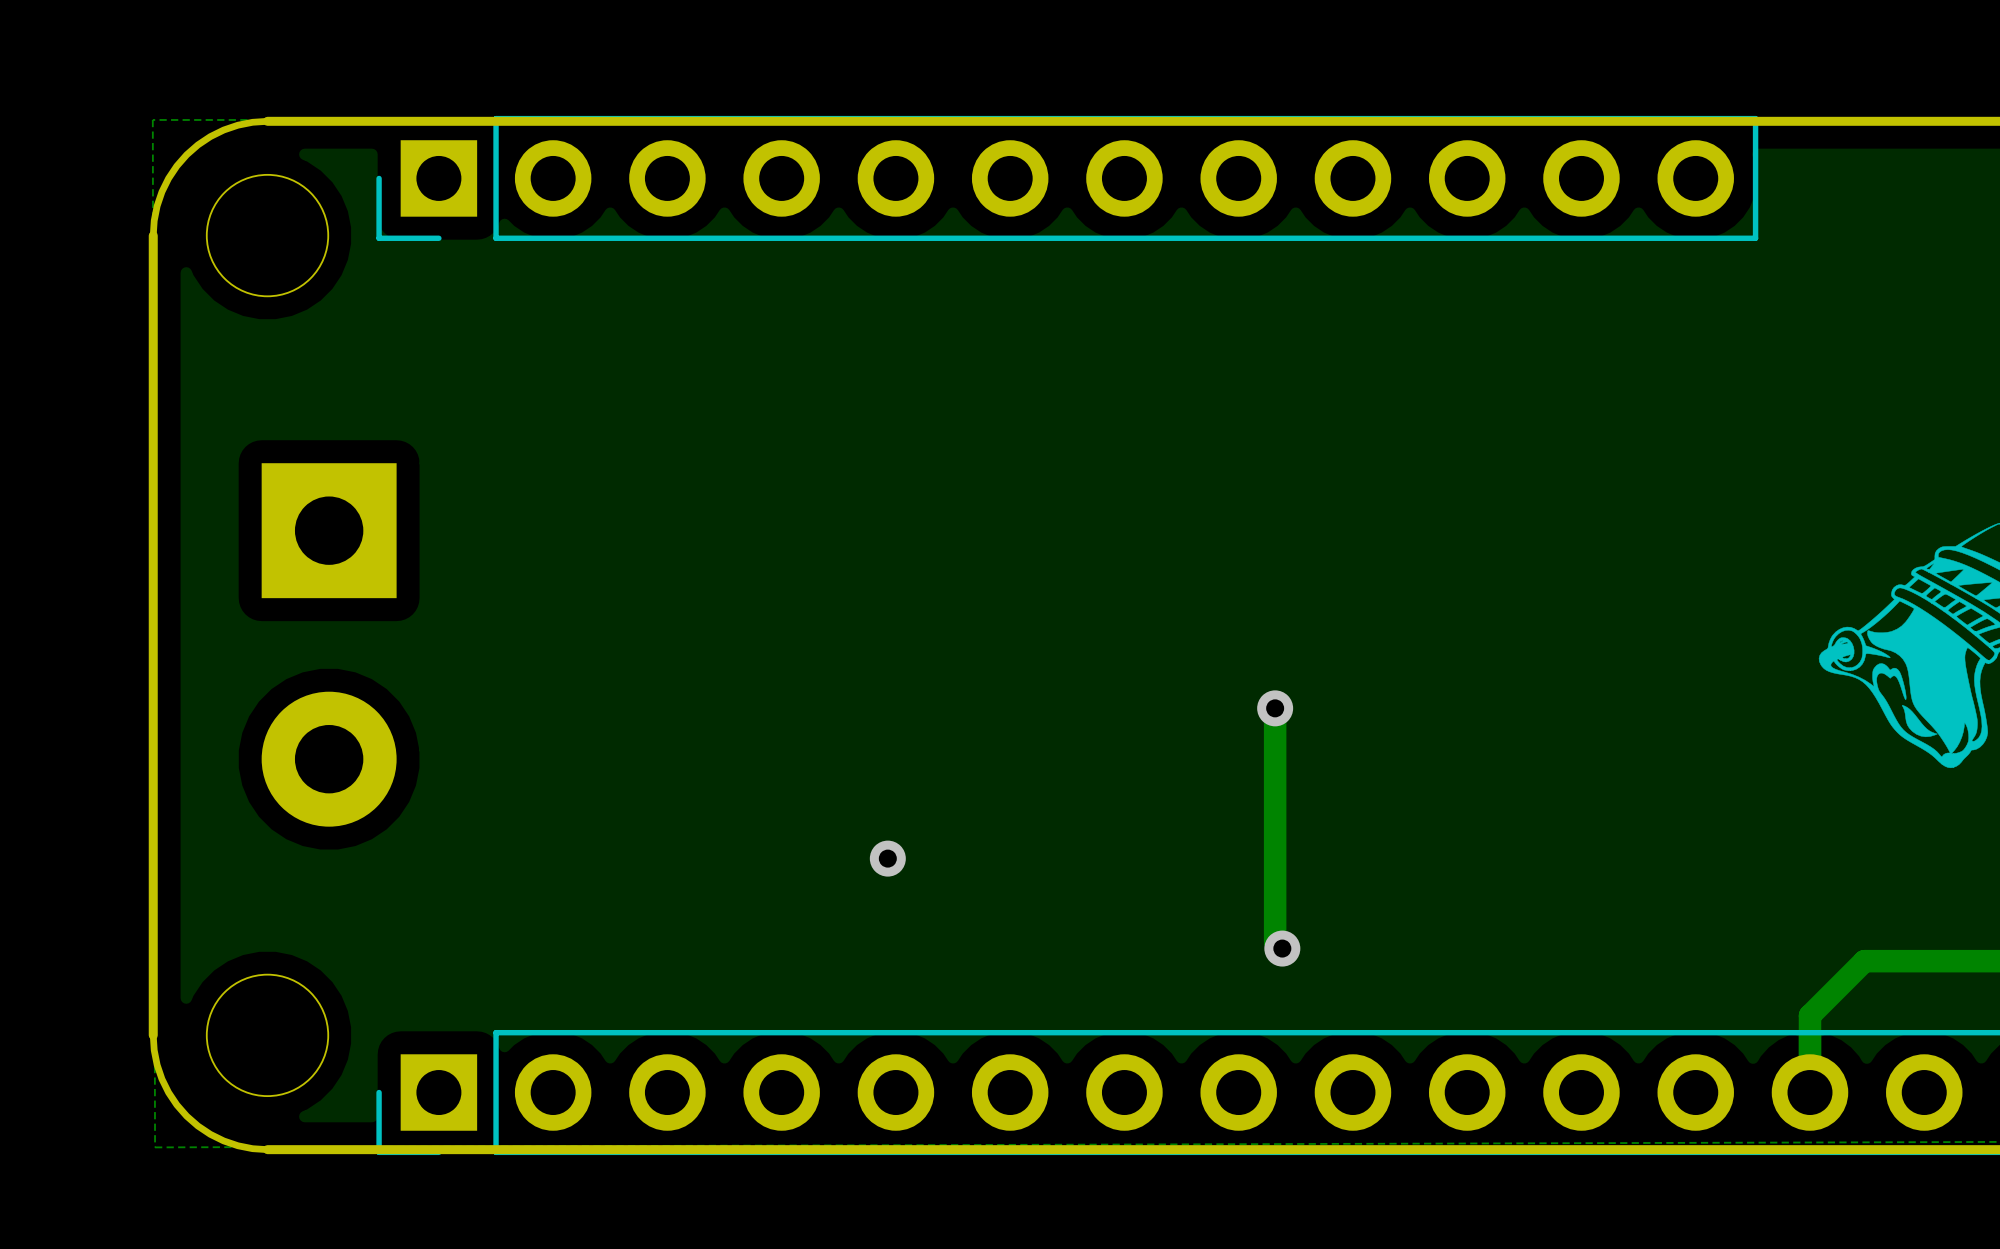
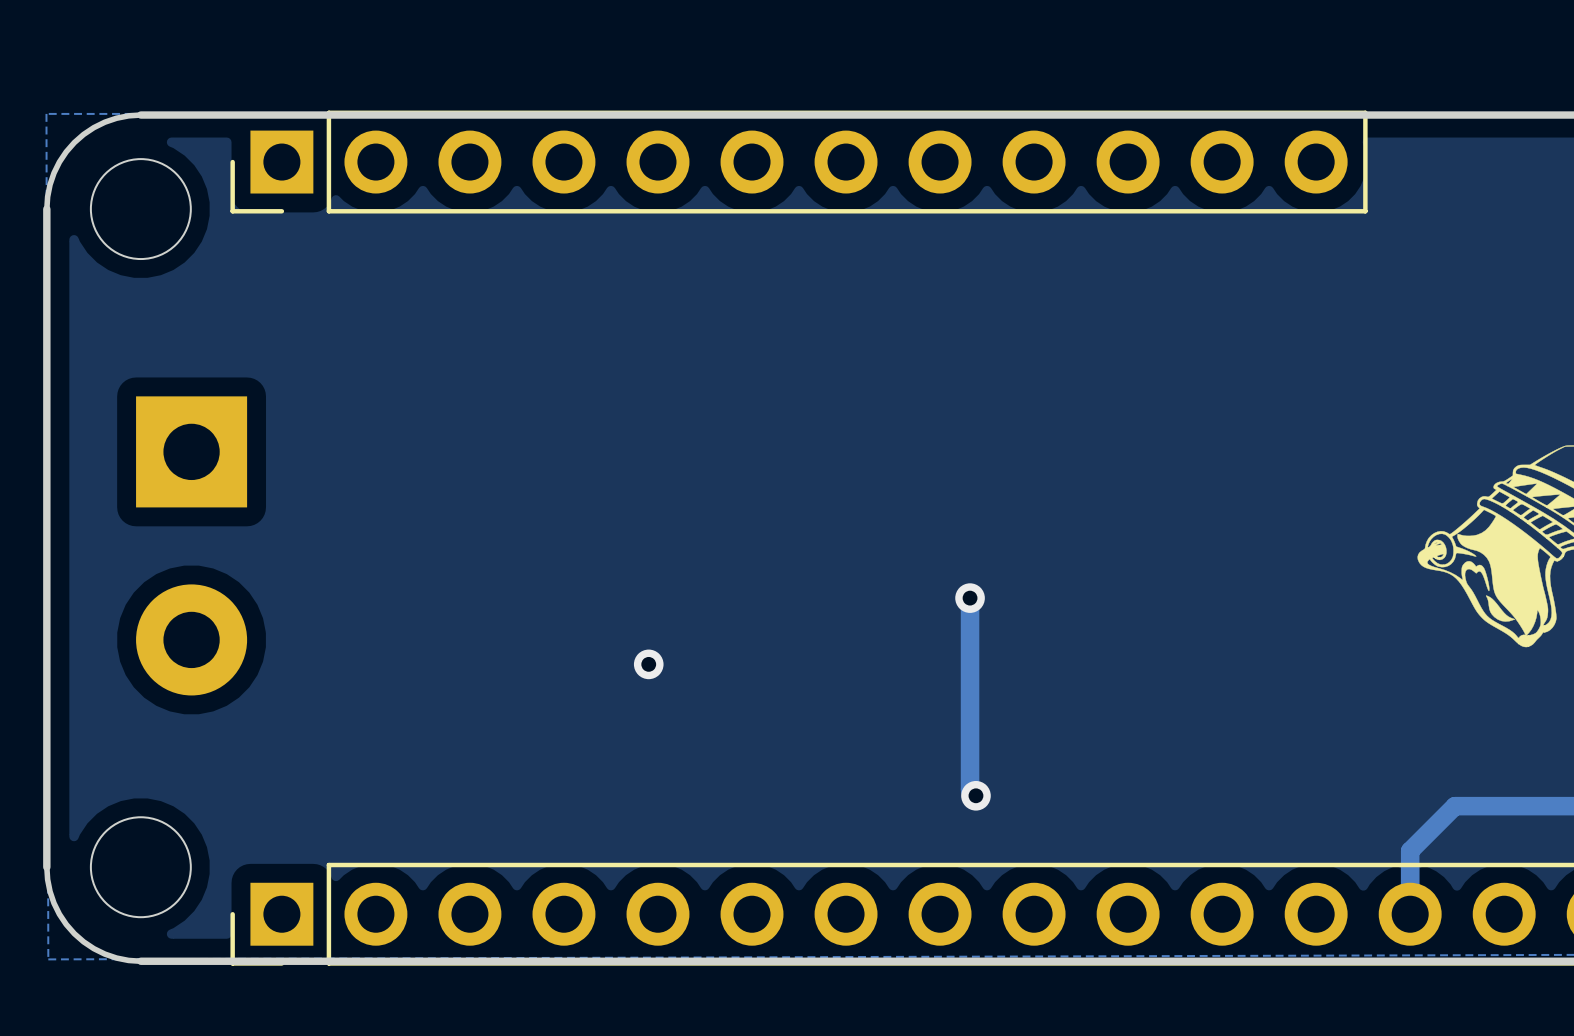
via position: (887, 858) -> (648, 664)

